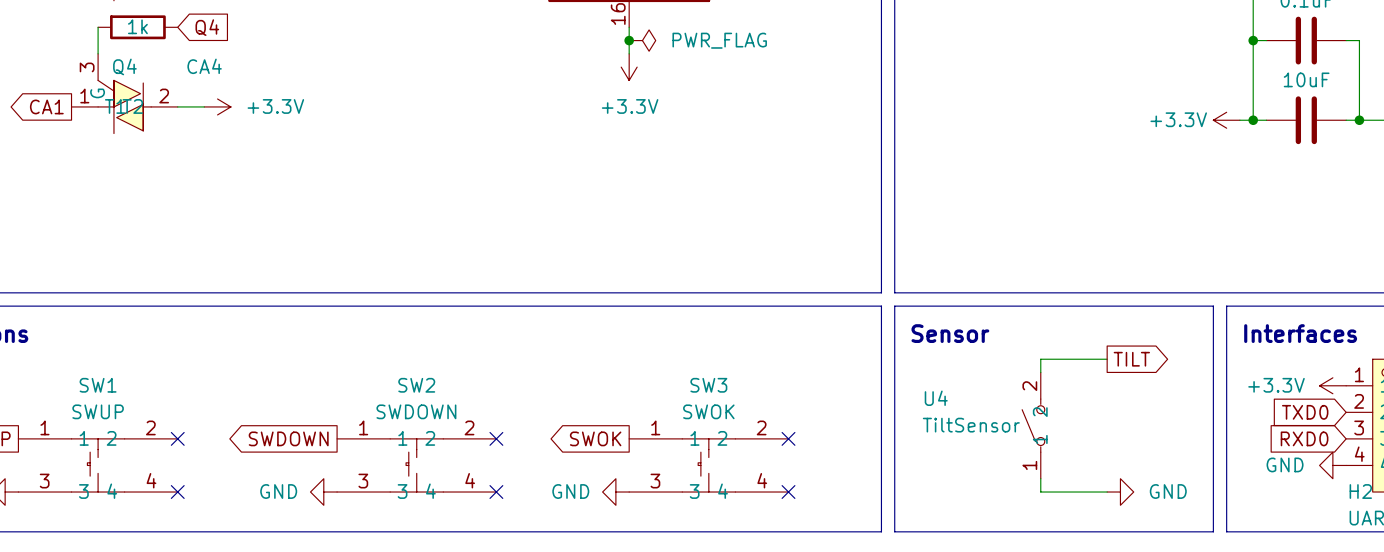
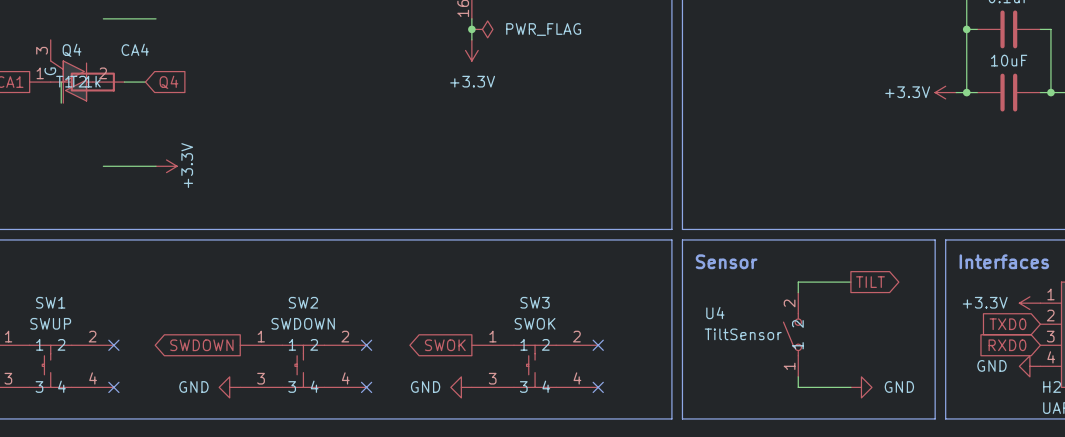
wire: (98, 27) (98, 53) -> (61, 82) (61, 103)
part: 1k (137, 27) -> none
wire: none -> (103, 18) (156, 18)
global label position: Q4 (207, 27) -> Q4 (168, 82)
part: none -> 1k (92, 82)
power symbol position: +3.3V (217, 106) -> +3.3V (166, 166)
power symbol text rotation: 0° (275, 106) -> 90° counterclockwise (187, 165)
wire: none -> (103, 166) (156, 166)

